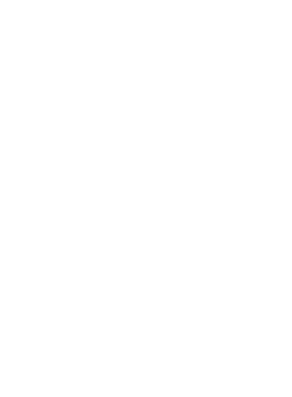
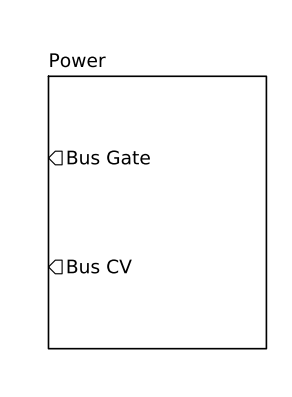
sheet pin: none -> Bus Gate (108, 157)
sheet Power: none -> (157, 212)
sheet pin: none -> Bus CV (99, 266)

